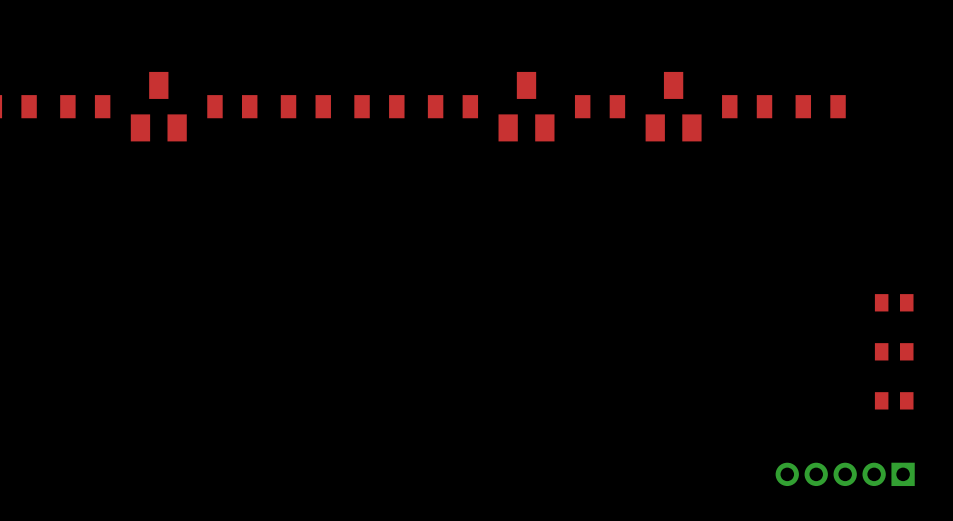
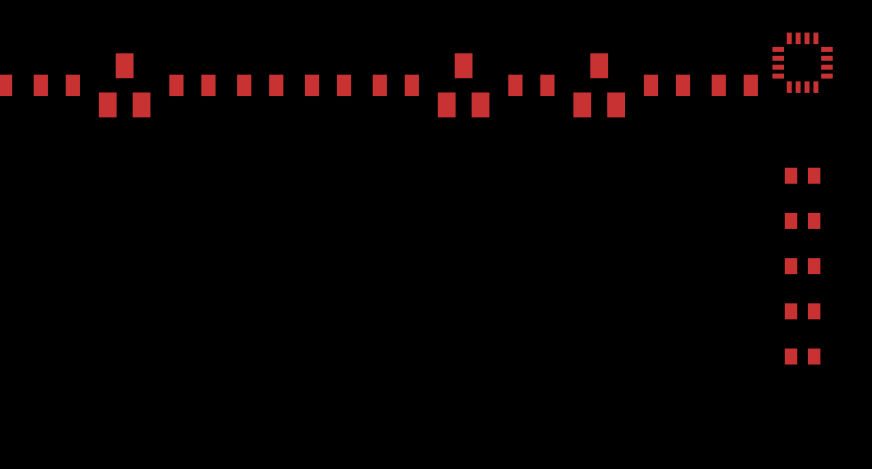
part: none -> (802, 62)
part: none -> (802, 175)
part: none -> (802, 220)
part: (845, 474) -> none

